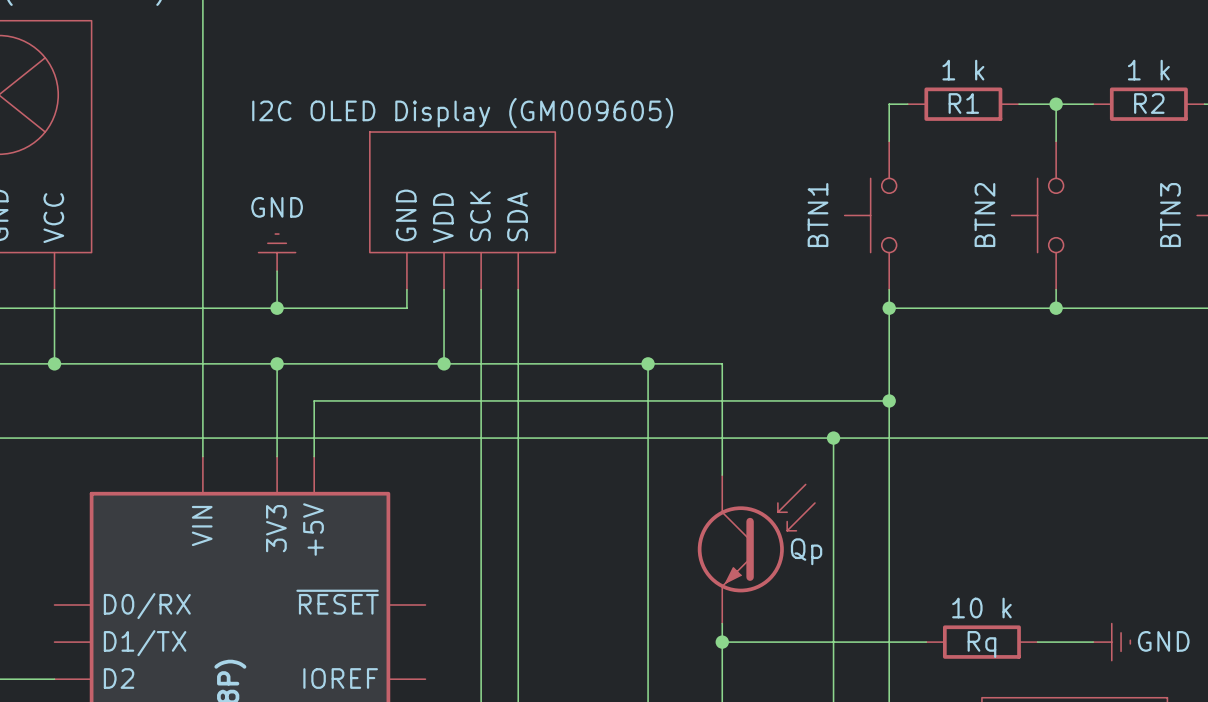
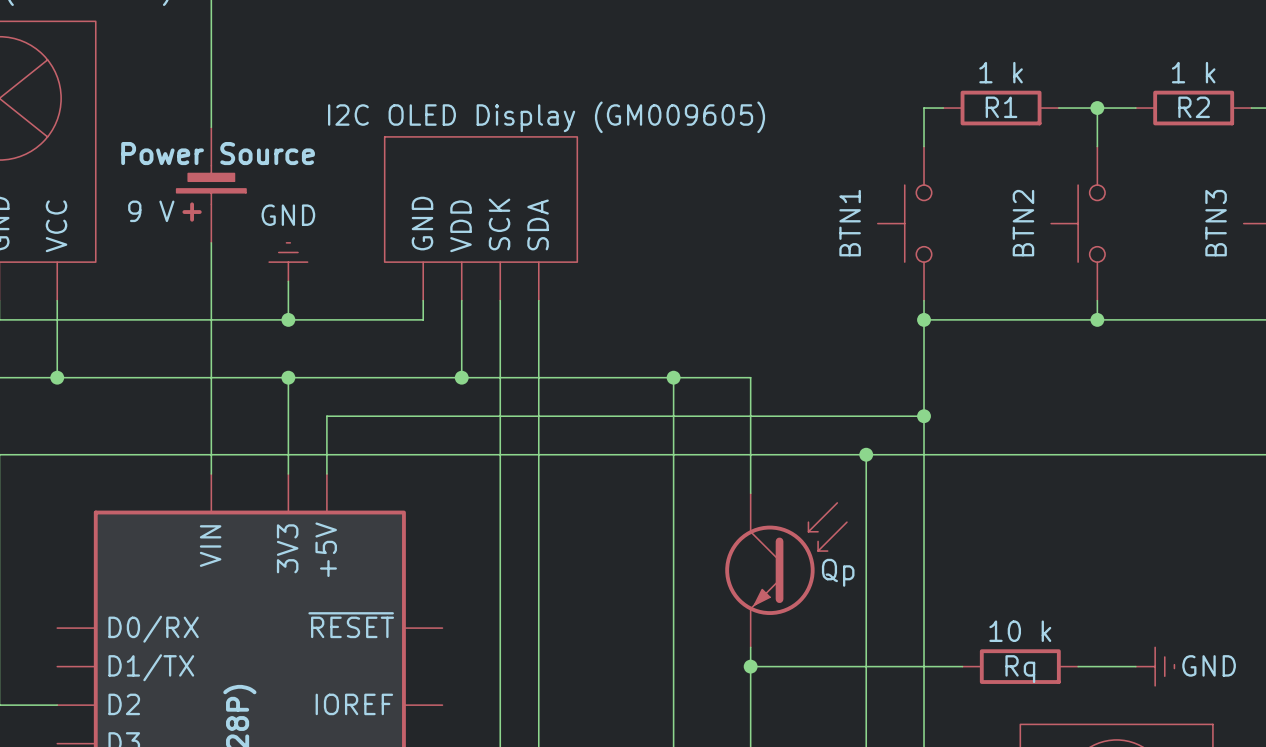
part value position: I2C OLED Display (GM009605) (462, 113) -> I2C OLED Display (GM009605) (546, 117)
part: none -> 9 V (211, 185)

